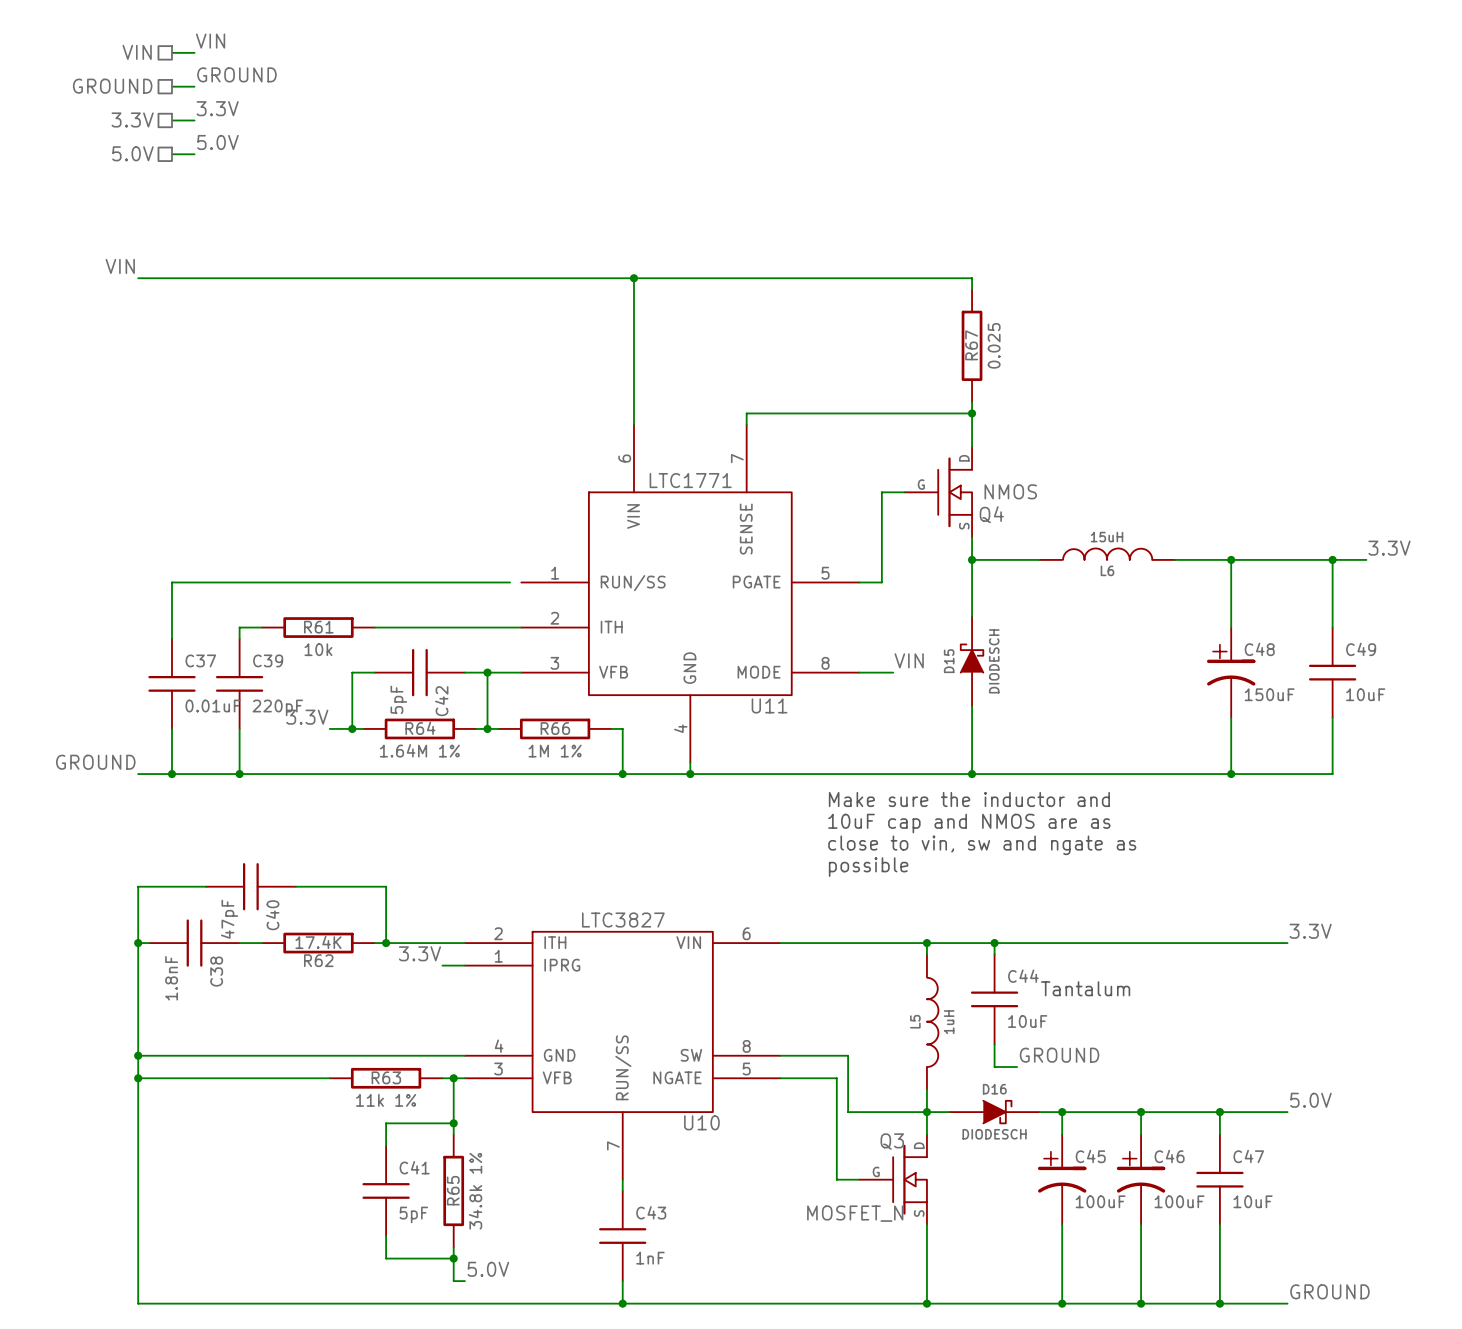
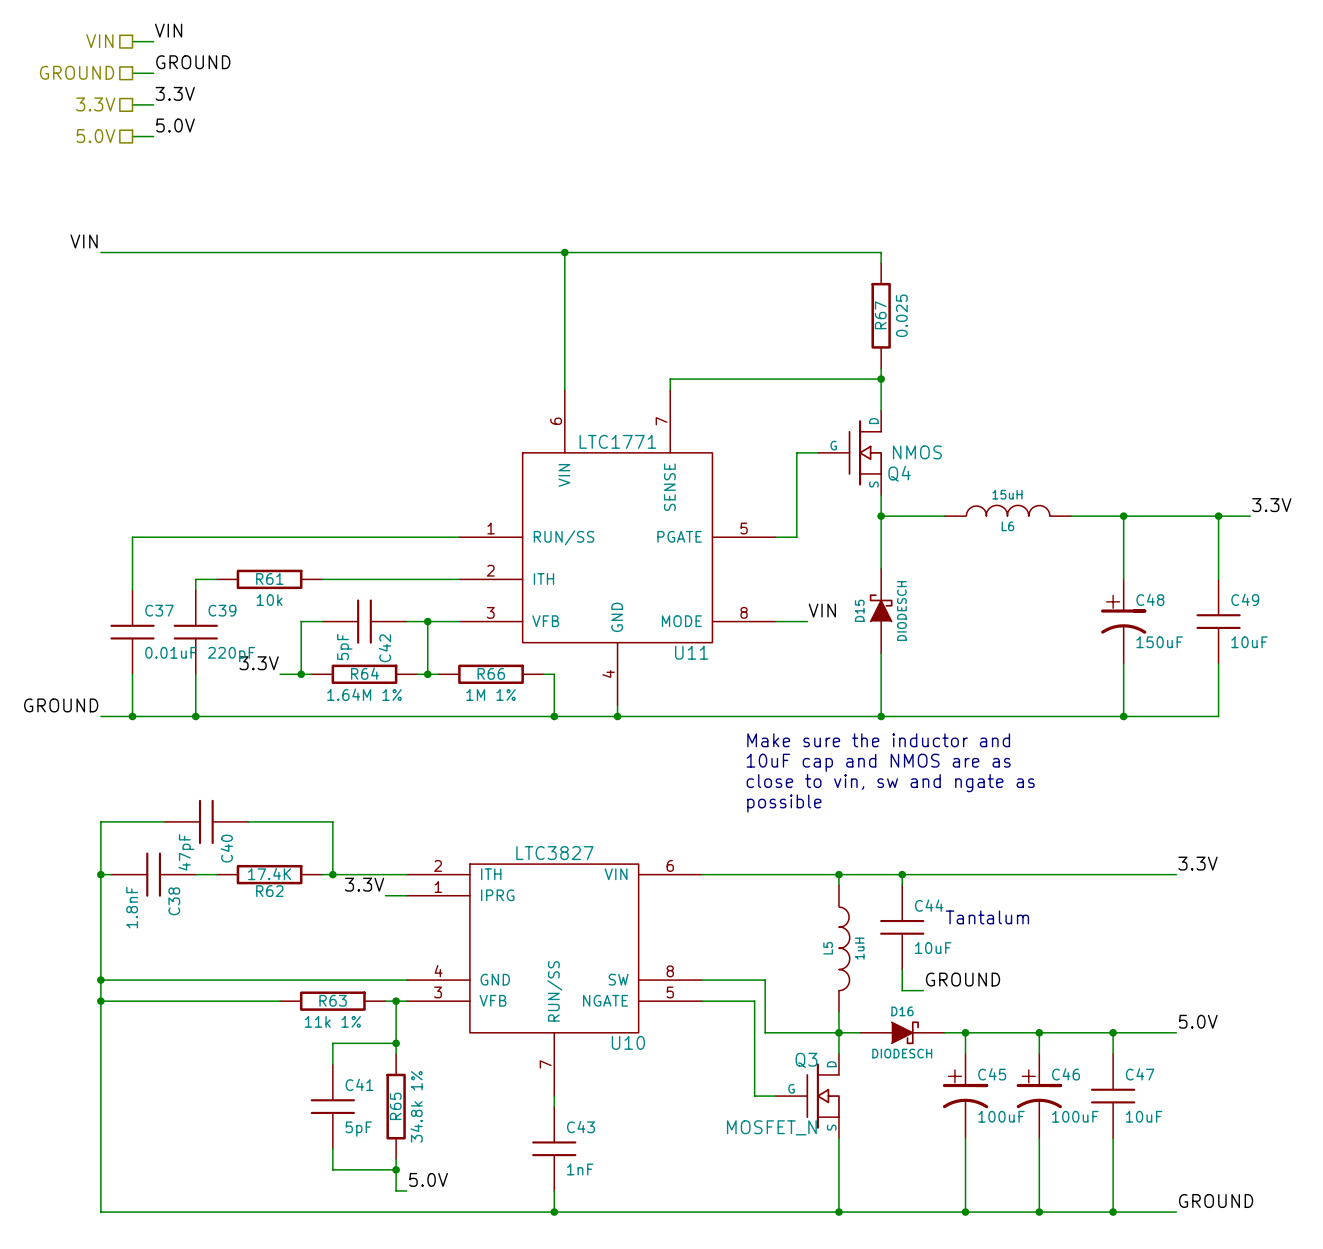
wire: none -> (448, 537) (459, 537)

